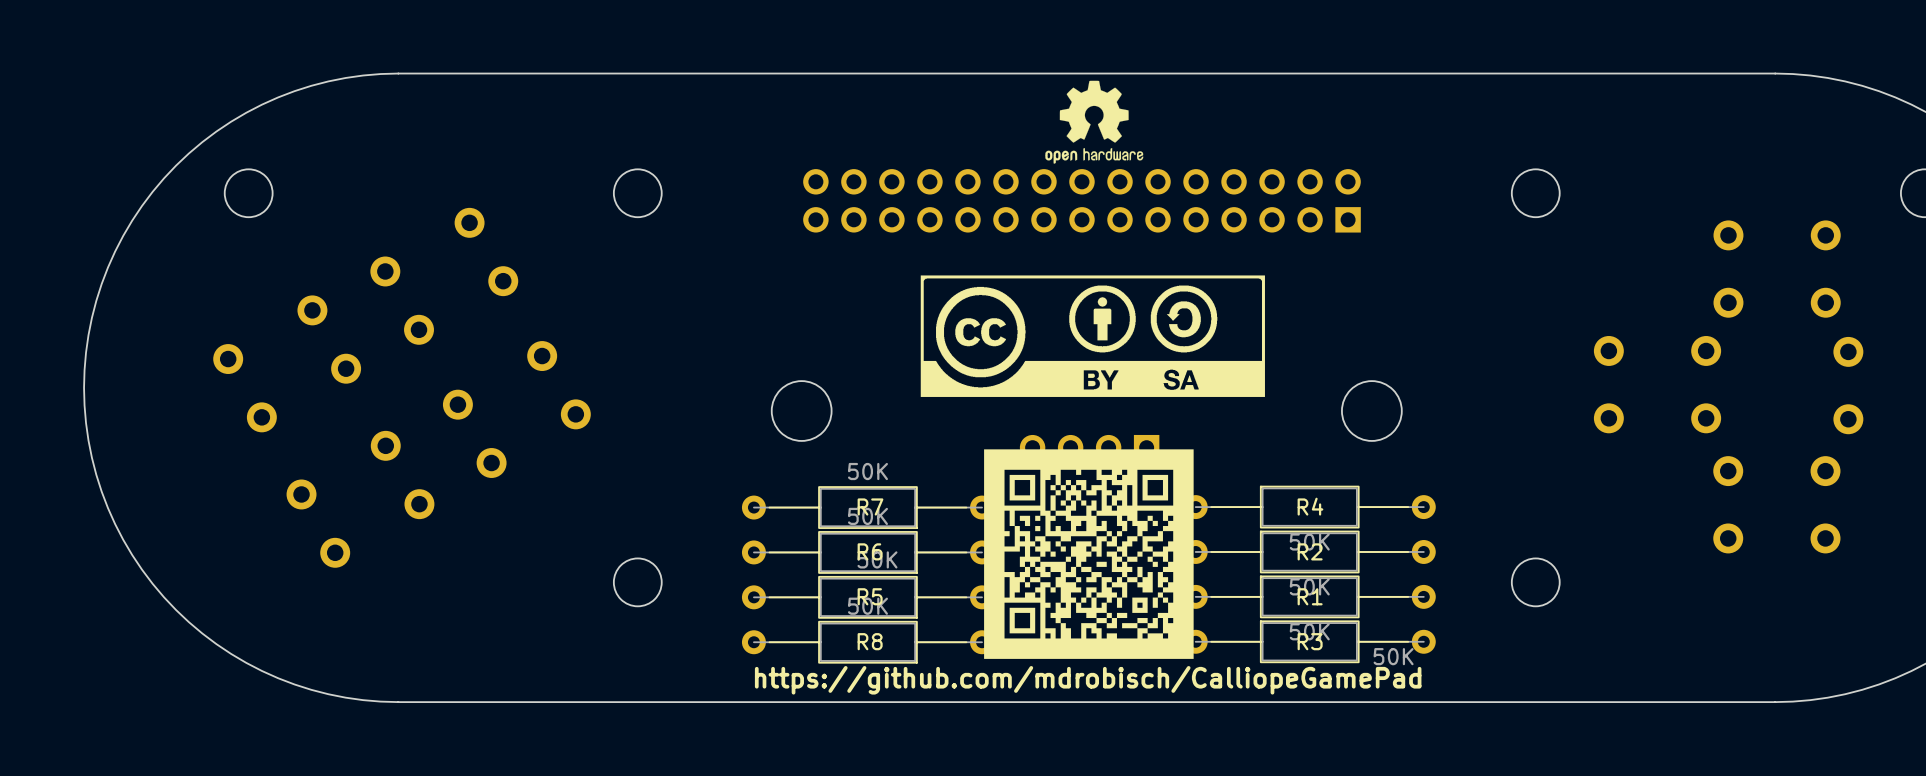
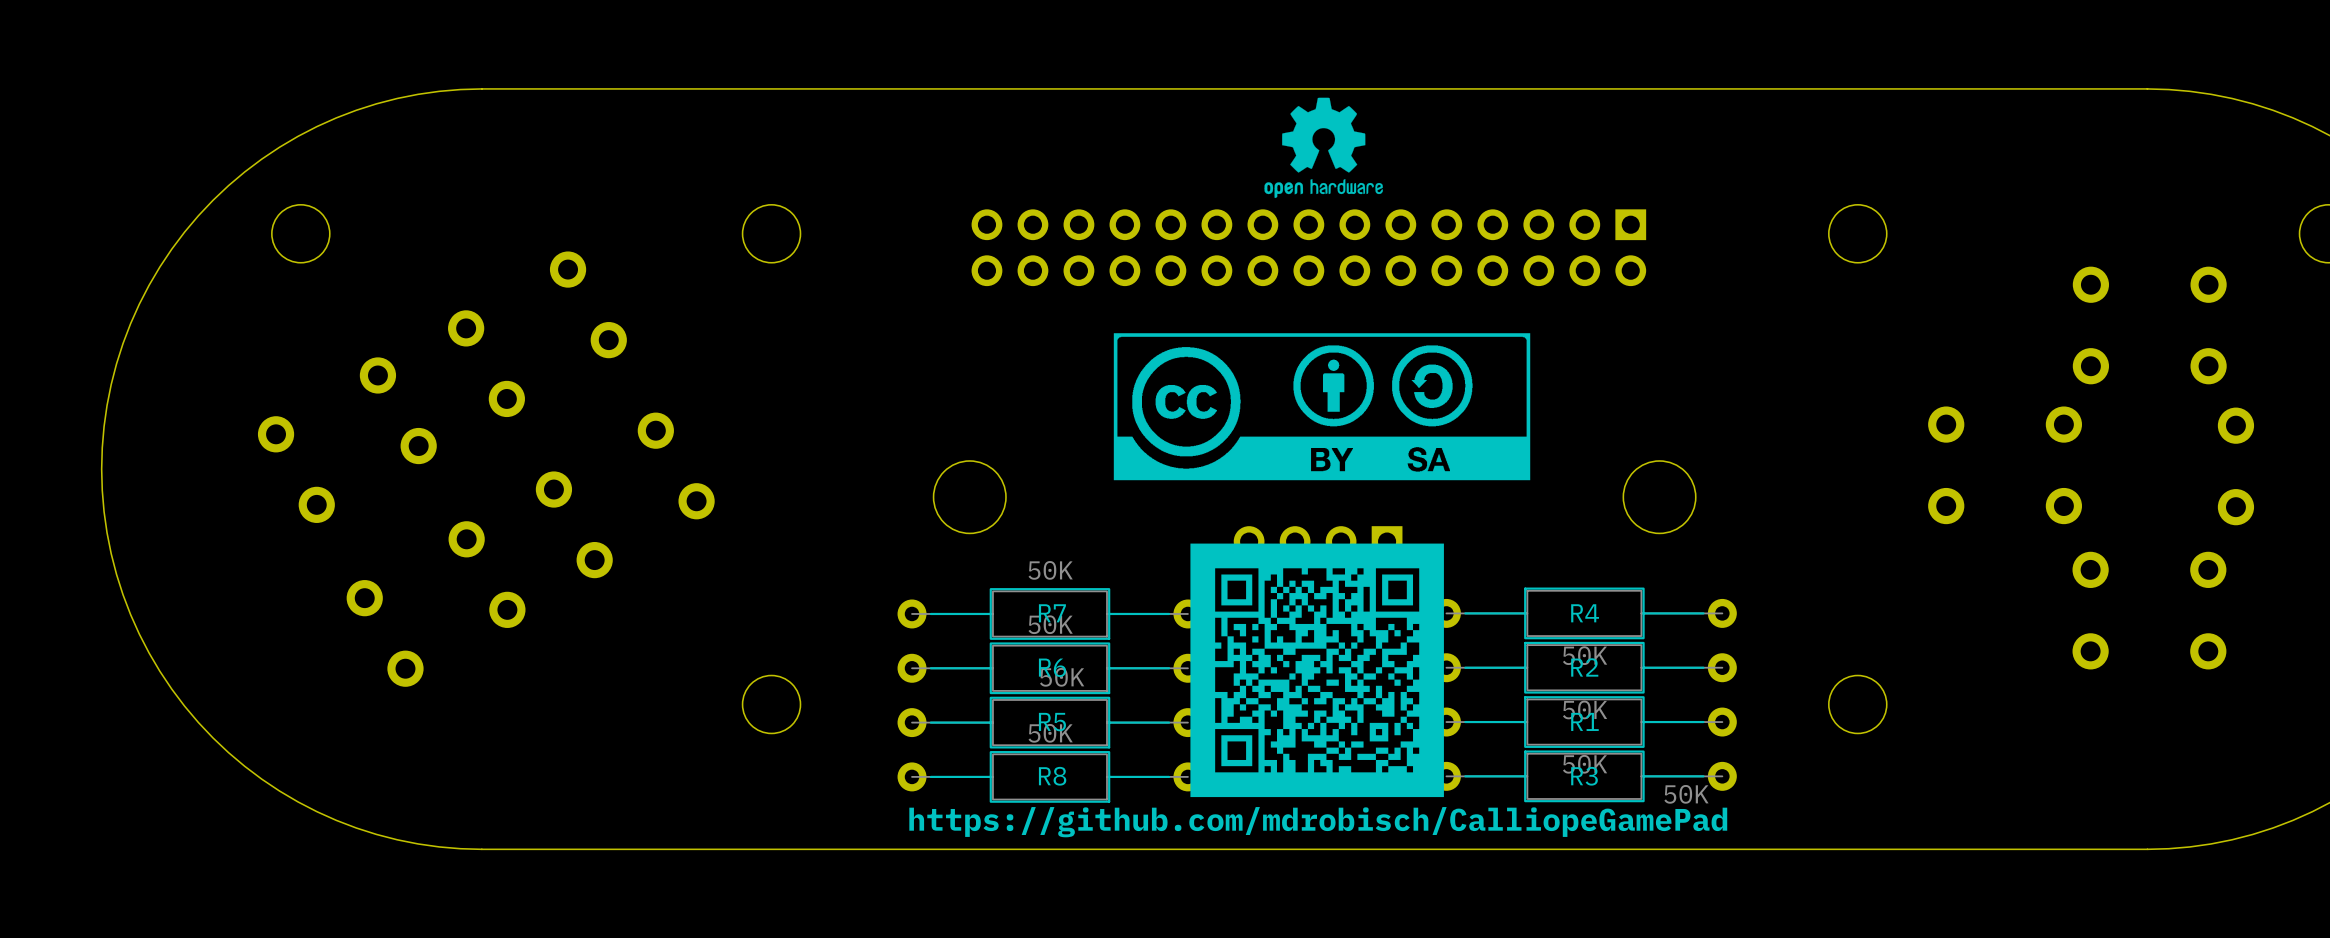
part footprint: [803, 169, 1361, 233] -> [971, 209, 1647, 287]

